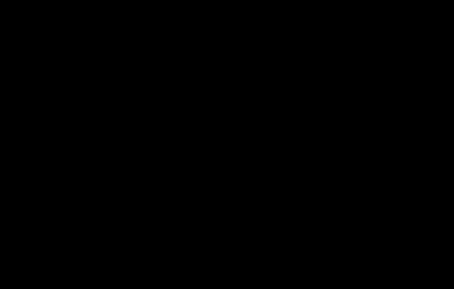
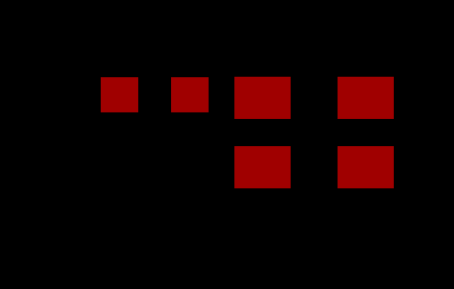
part: none -> (154, 94)
part: none -> (314, 97)
part: none -> (314, 167)

